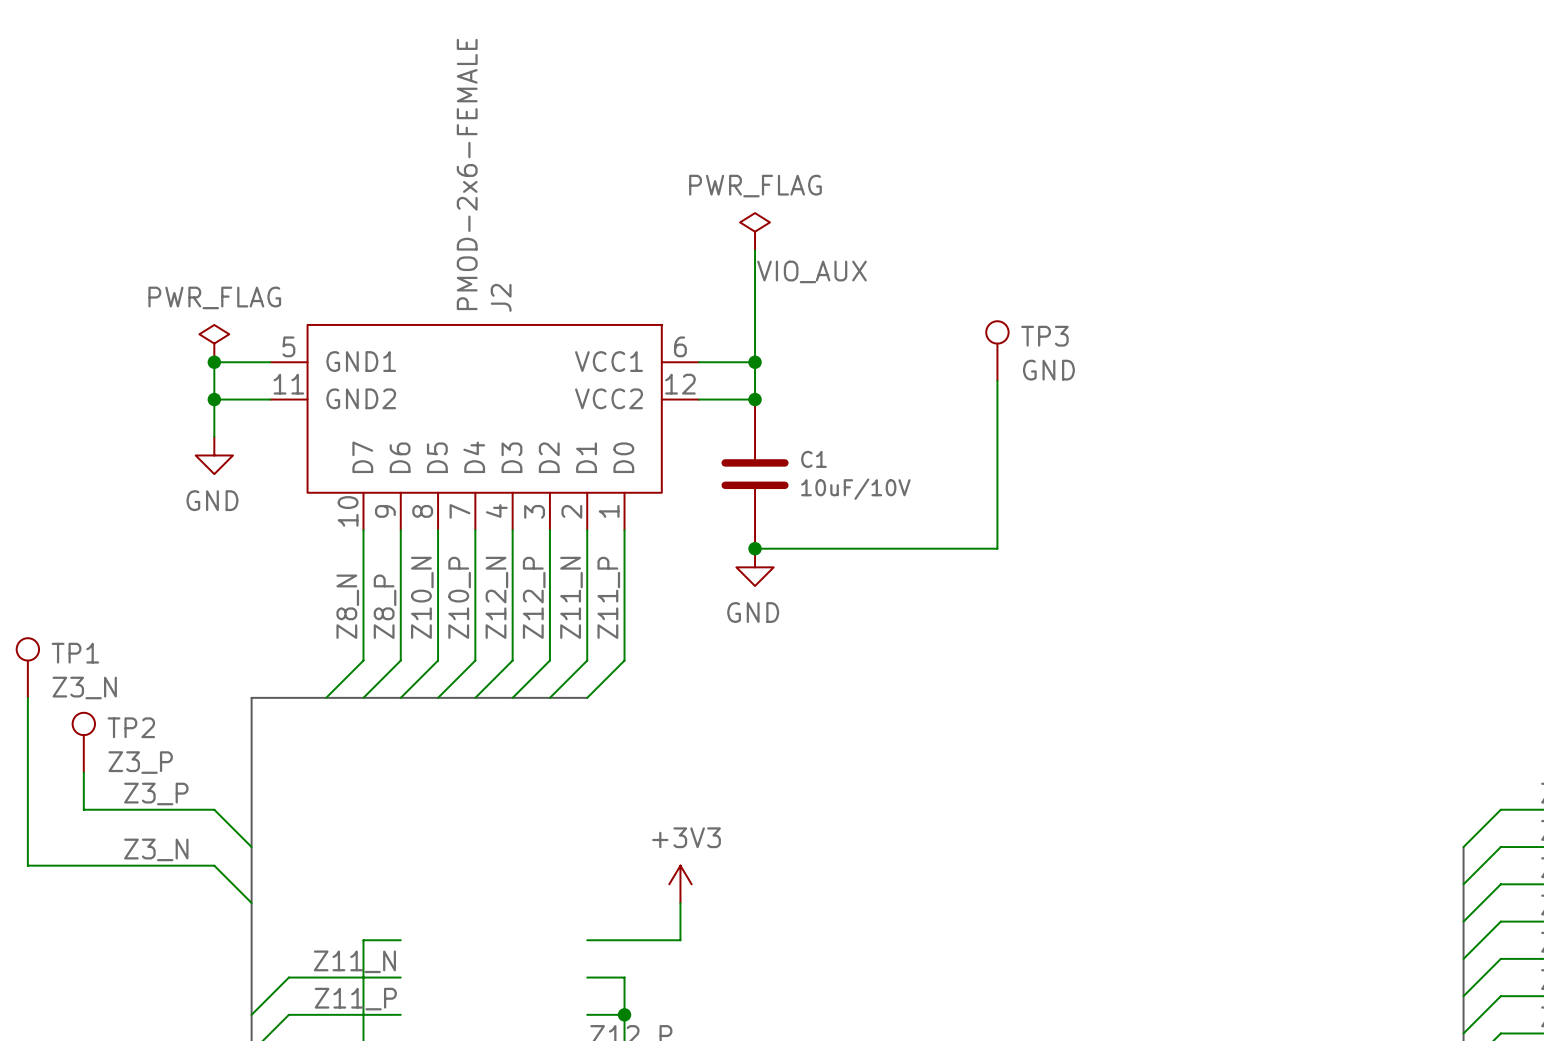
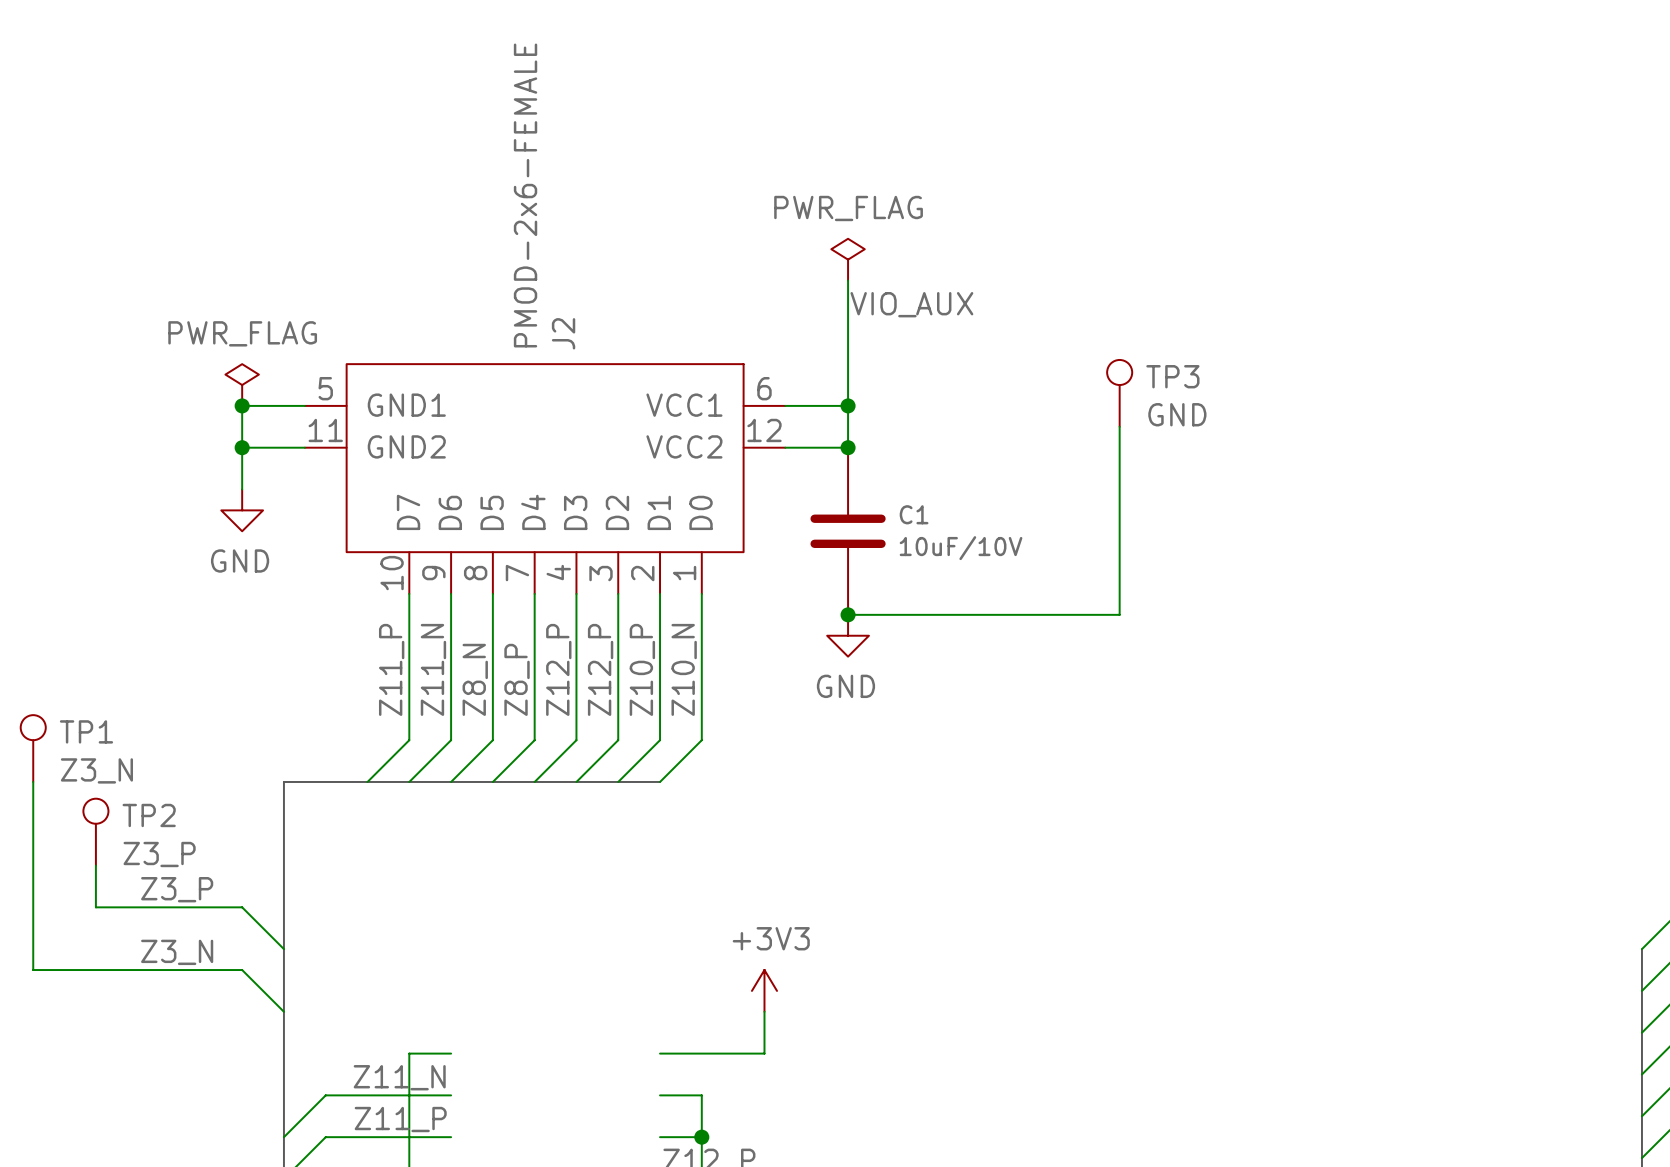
label: Z10_N (422, 597) -> Z8_N (475, 679)
label: Z10_P (459, 597) -> Z8_P (517, 679)
label: Z12_N (496, 597) -> Z12_P (558, 669)
label: Z11_N (571, 597) -> Z10_P (642, 669)
label: Z11_P (608, 597) -> Z10_N (684, 669)
label: Z8_N (347, 606) -> Z11_P (391, 669)
label: Z8_P (385, 606) -> Z11_N (433, 669)

